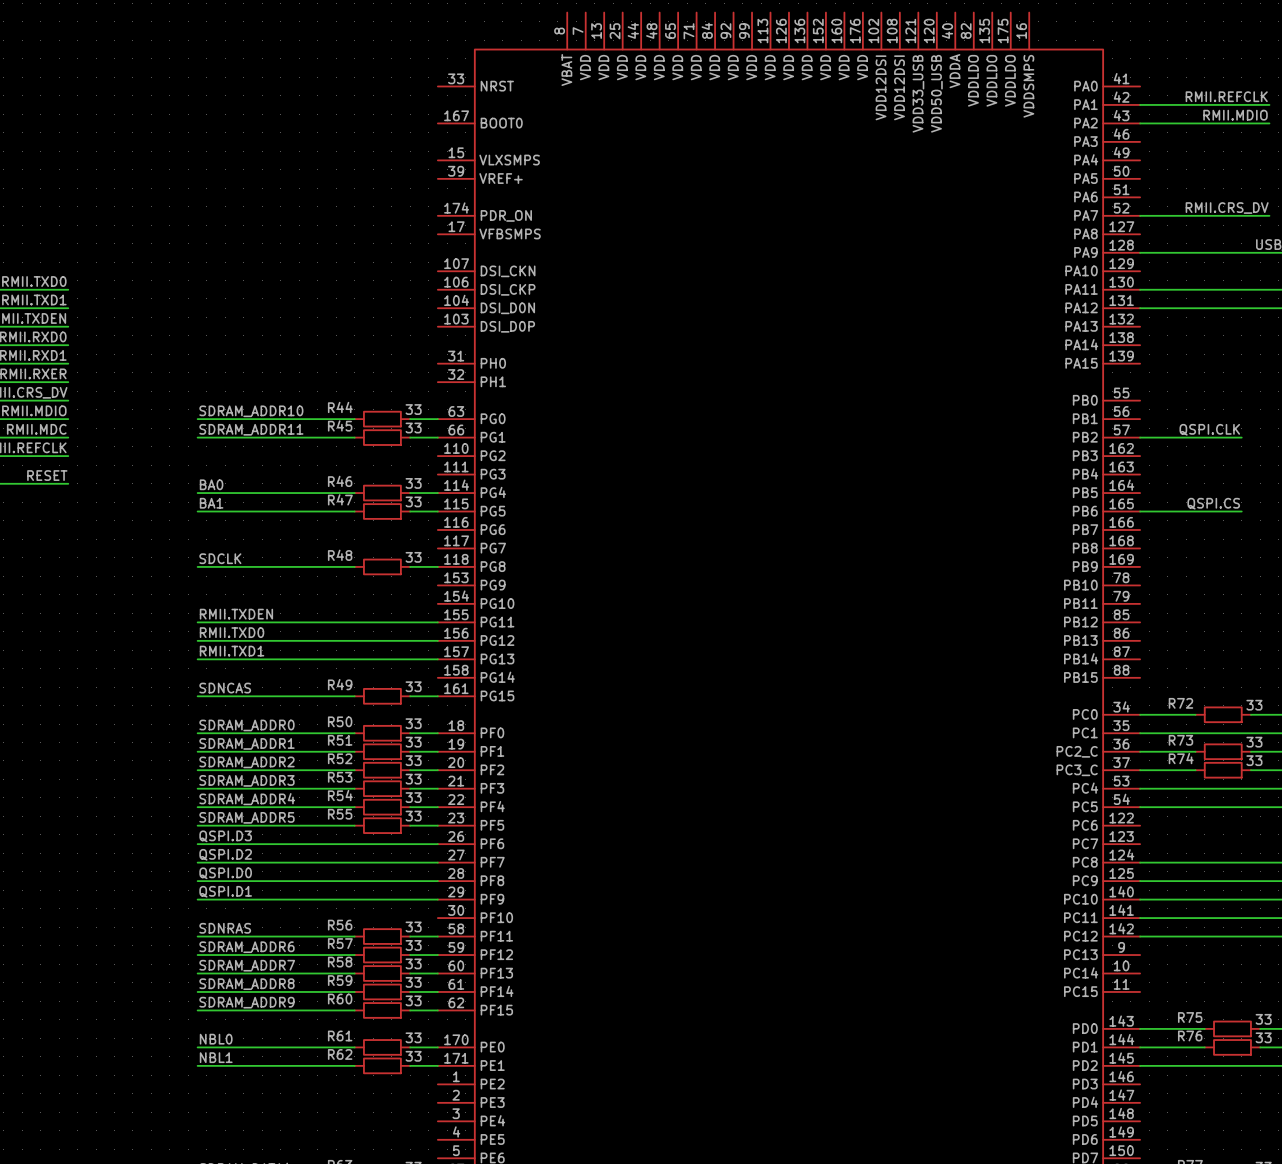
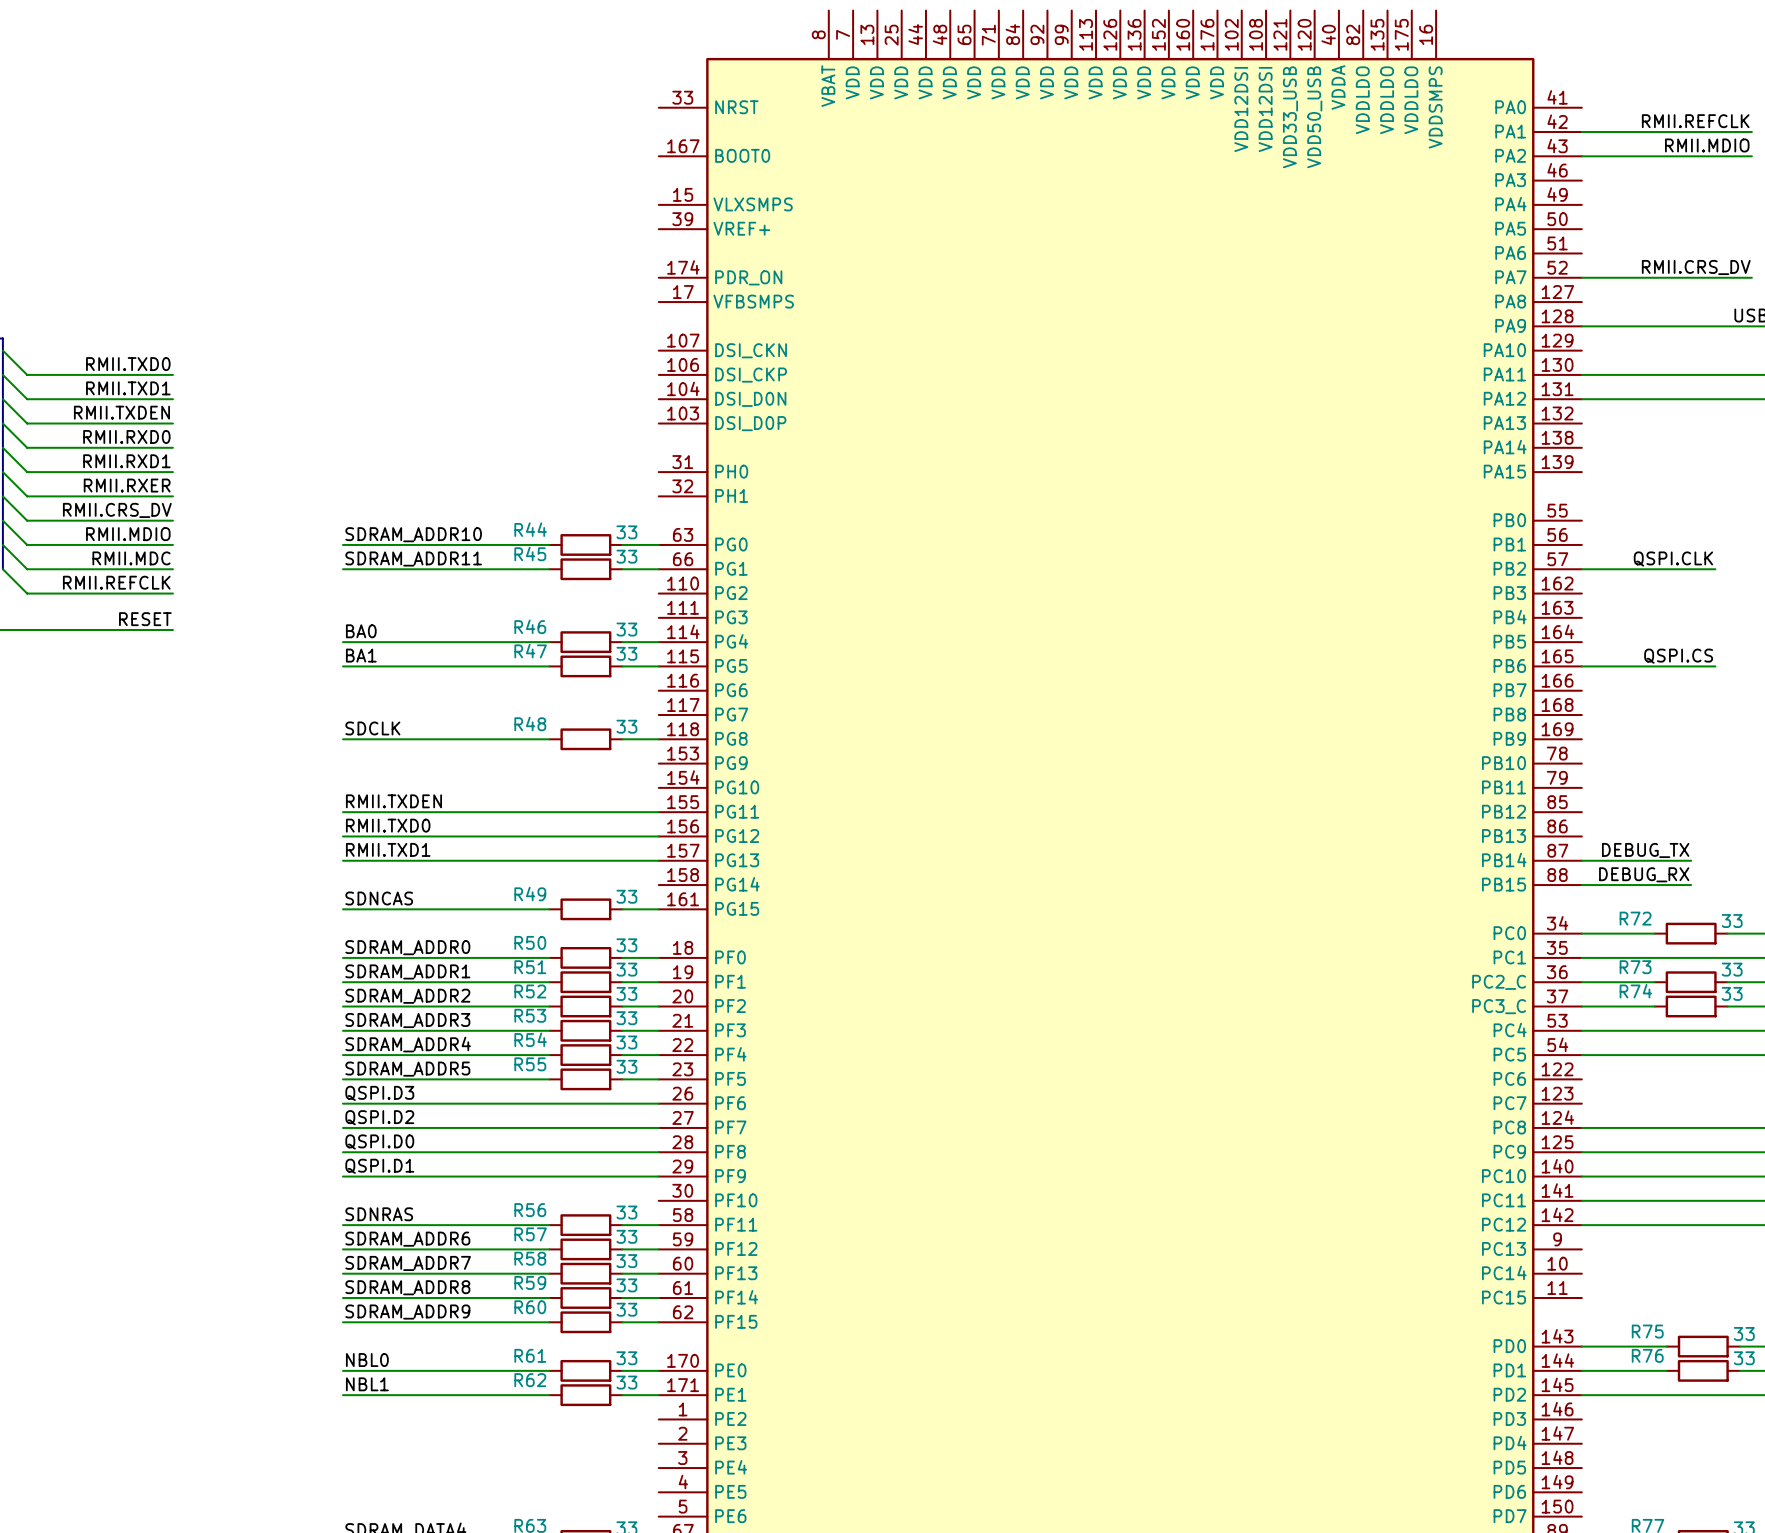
label: none -> DEBUG_TX (1645, 850)
wire: none -> (1581, 860) (1691, 860)
label: none -> DEBUG_RX (1644, 874)
wire: none -> (1581, 885) (1691, 885)

